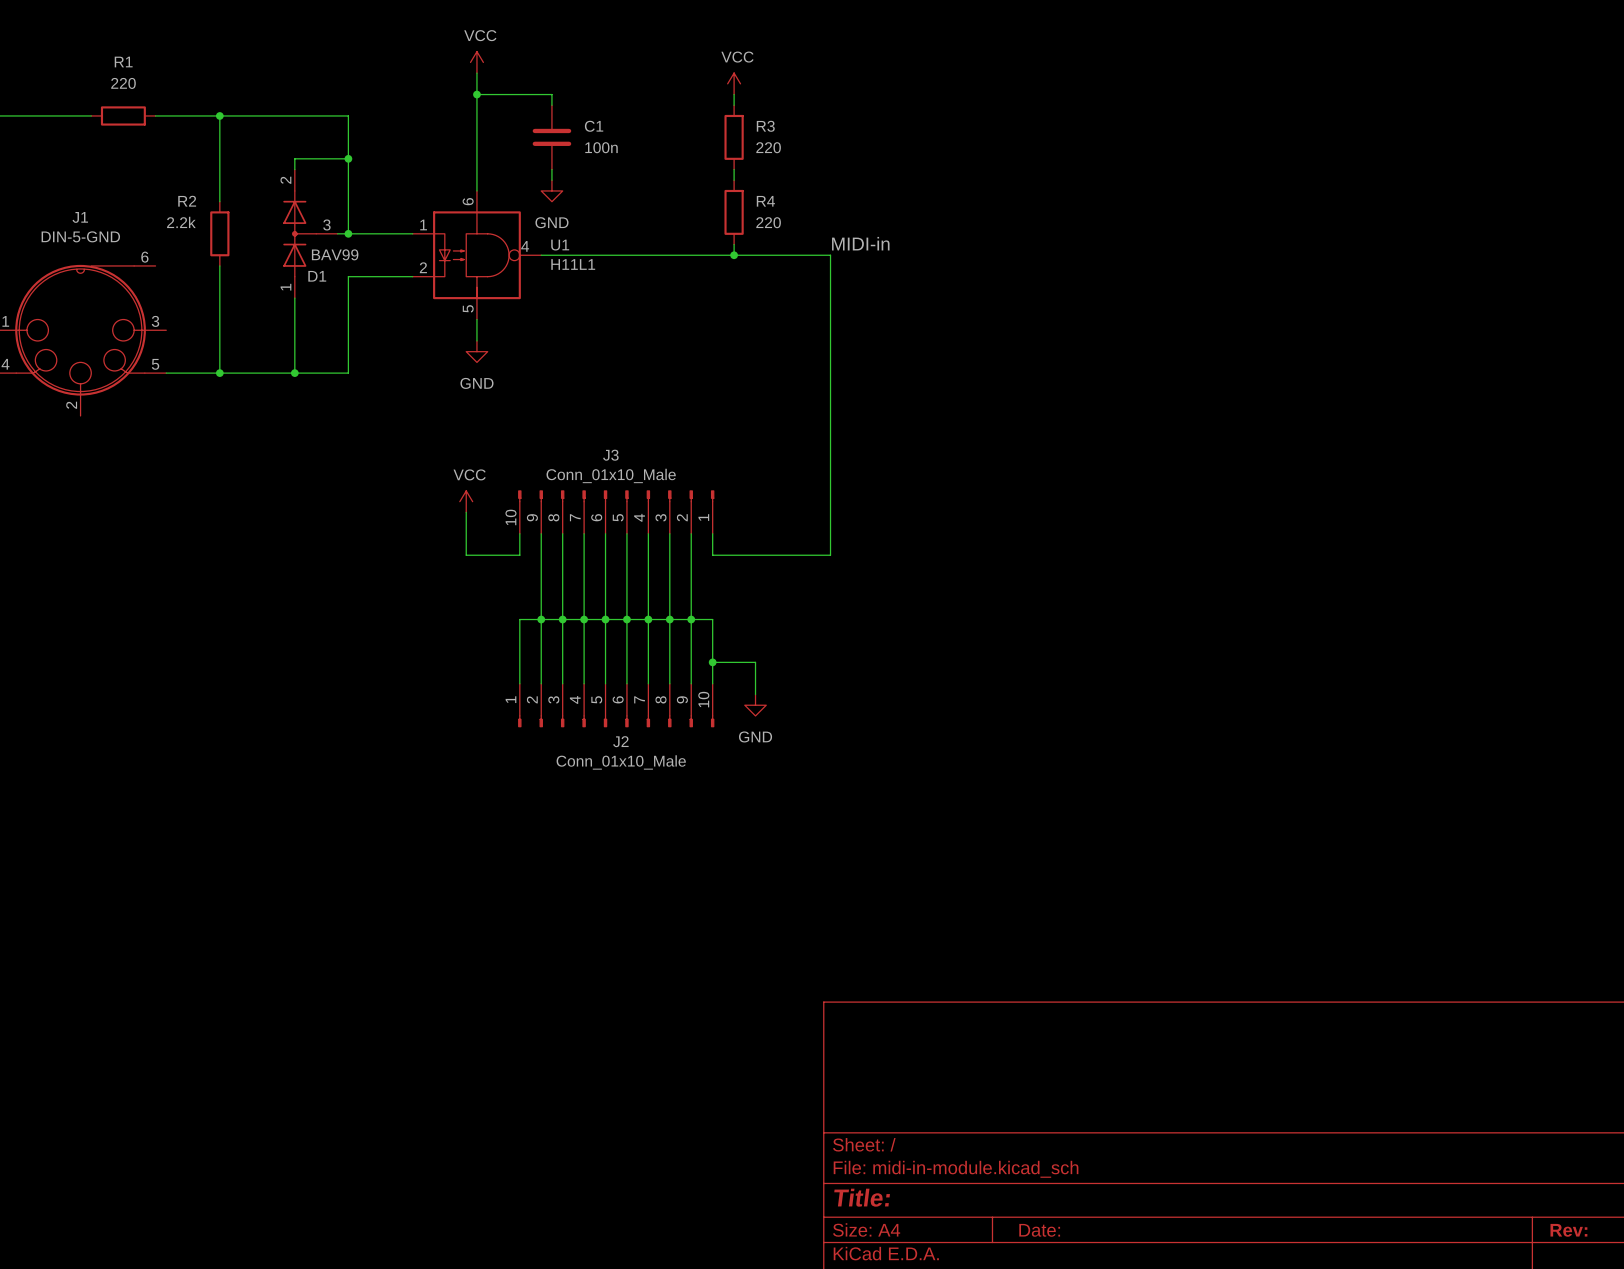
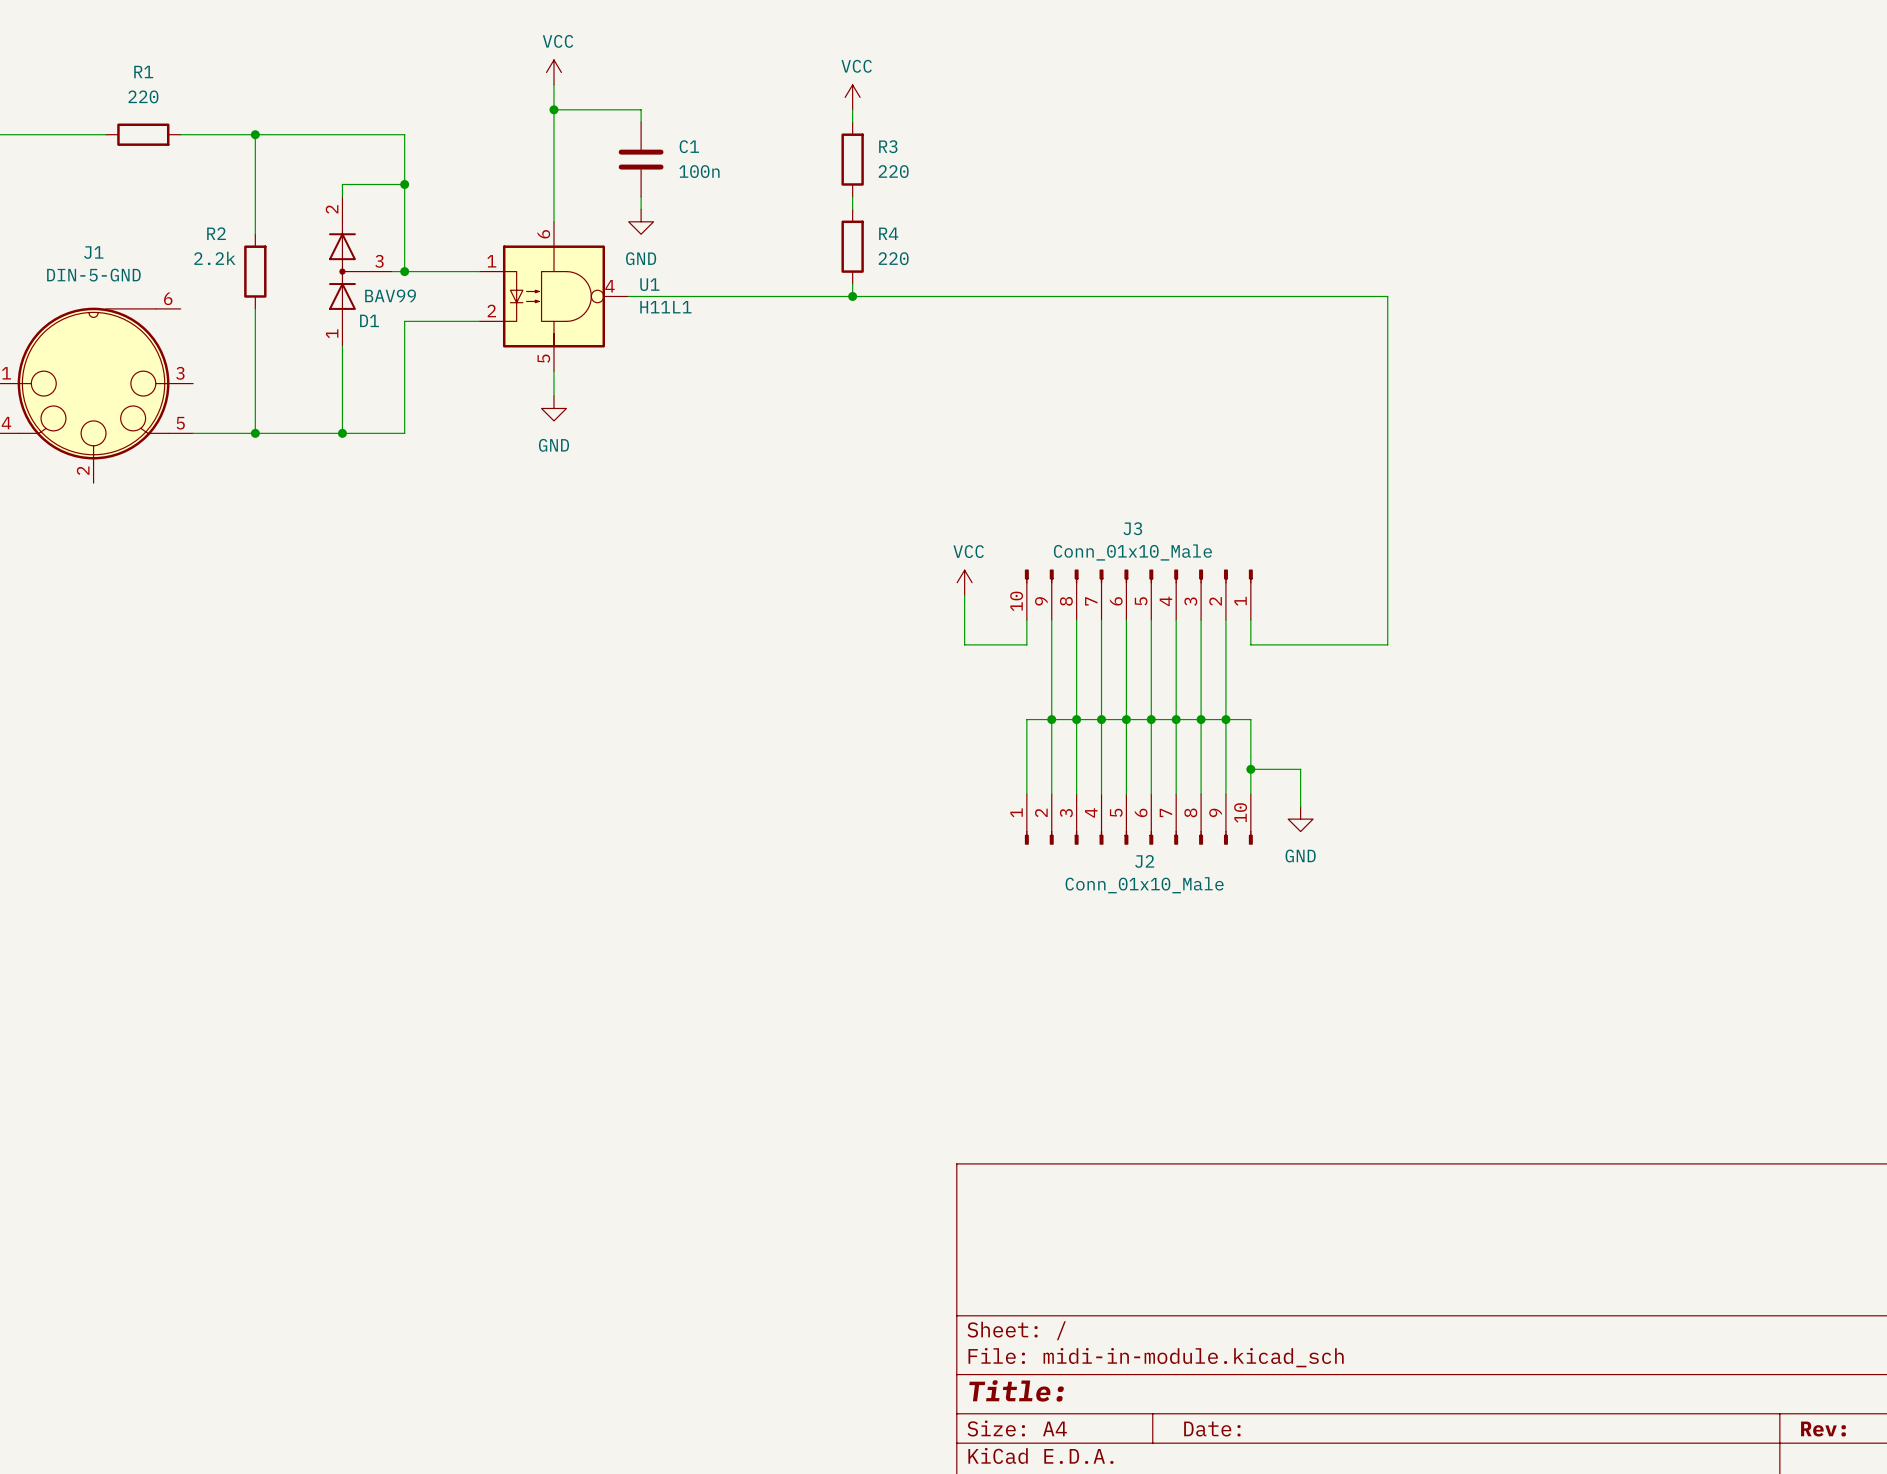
label: MIDI-in (860, 243) -> none
wire: (830, 255) (830, 512) -> (964, 296) (1387, 296) (1387, 644) (1250, 644) (1250, 620)
power symbol: VCC (466, 501) -> none
power symbol: none -> VCC (964, 582)
wire: (466, 512) (466, 555) (519, 555) (519, 533) -> none
J3 position: (616, 512) -> (1138, 594)
wire: (541, 533) (541, 683) -> none
wire: (562, 533) (562, 683) -> none
wire: (584, 533) (584, 683) -> none
wire: (605, 533) (605, 683) -> none
wire: (626, 533) (626, 683) -> none
wire: (648, 533) (648, 683) -> none
wire: (669, 533) (669, 683) -> none
wire: (691, 533) (691, 683) -> none
wire: (712, 533) (712, 555) (830, 555) -> (1026, 620) (1026, 644) (964, 644)
wire: none -> (1051, 620) (1051, 794)
wire: none -> (1076, 620) (1076, 794)
wire: none -> (1101, 620) (1101, 794)
wire: none -> (1126, 620) (1126, 794)
wire: none -> (1151, 620) (1151, 794)
wire: none -> (1176, 620) (1176, 794)
wire: none -> (1201, 620) (1201, 794)
wire: none -> (1225, 620) (1225, 794)
junction: (541, 619) -> none
junction: (562, 619) -> none
junction: (584, 619) -> none
junction: (605, 619) -> none
junction: (626, 619) -> none
junction: (648, 619) -> none
junction: (669, 619) -> none
junction: (691, 619) -> none
junction: none -> (1051, 719)
junction: none -> (1076, 719)
junction: none -> (1101, 719)
junction: none -> (1126, 719)
junction: none -> (1151, 719)
junction: none -> (1176, 719)
junction: none -> (1201, 719)
junction: none -> (1225, 719)
wire: (712, 662) (755, 662) (755, 694) -> none
junction: (712, 662) -> none
wire: none -> (1250, 769) (1300, 769) (1300, 806)
junction: none -> (1250, 769)
wire: (519, 683) (519, 619) (712, 619) (712, 683) -> none
wire: none -> (1026, 794) (1026, 719) (1250, 719) (1250, 794)
J2 position: (616, 705) -> (1138, 819)
power symbol: GND (755, 705) -> none
power symbol: none -> GND (1300, 819)

